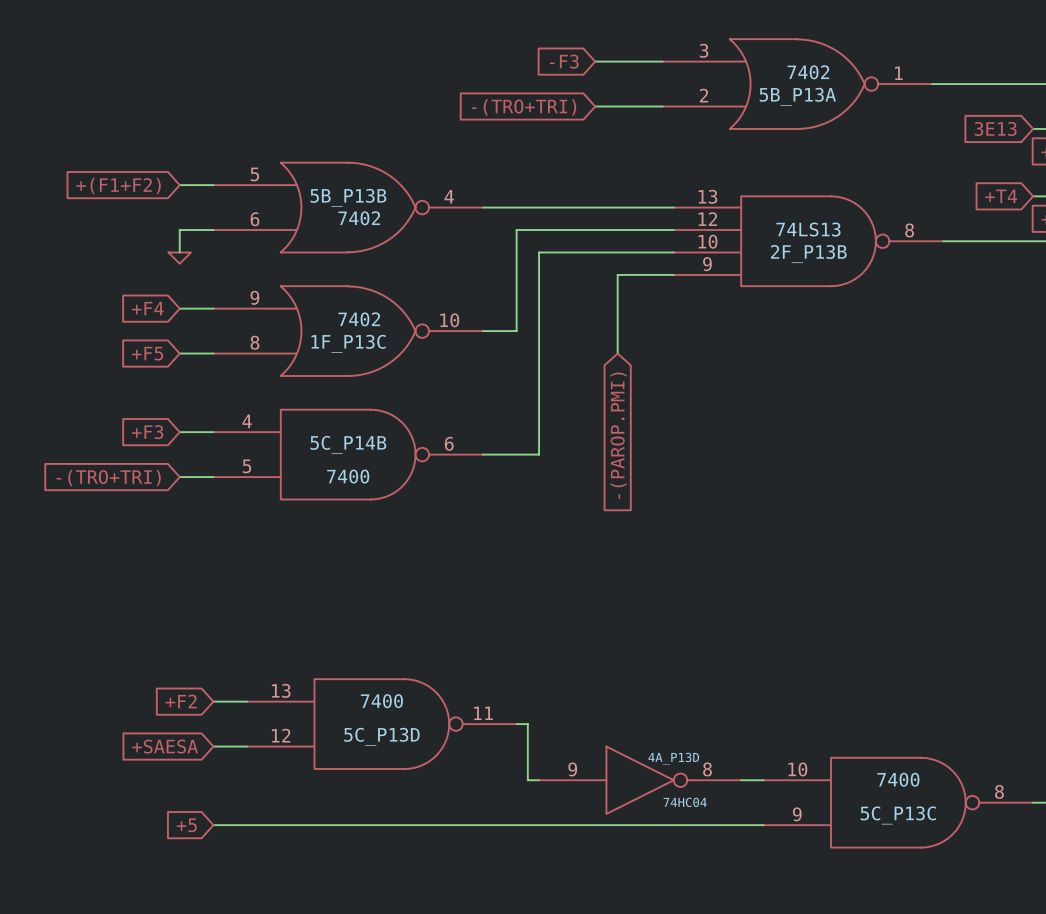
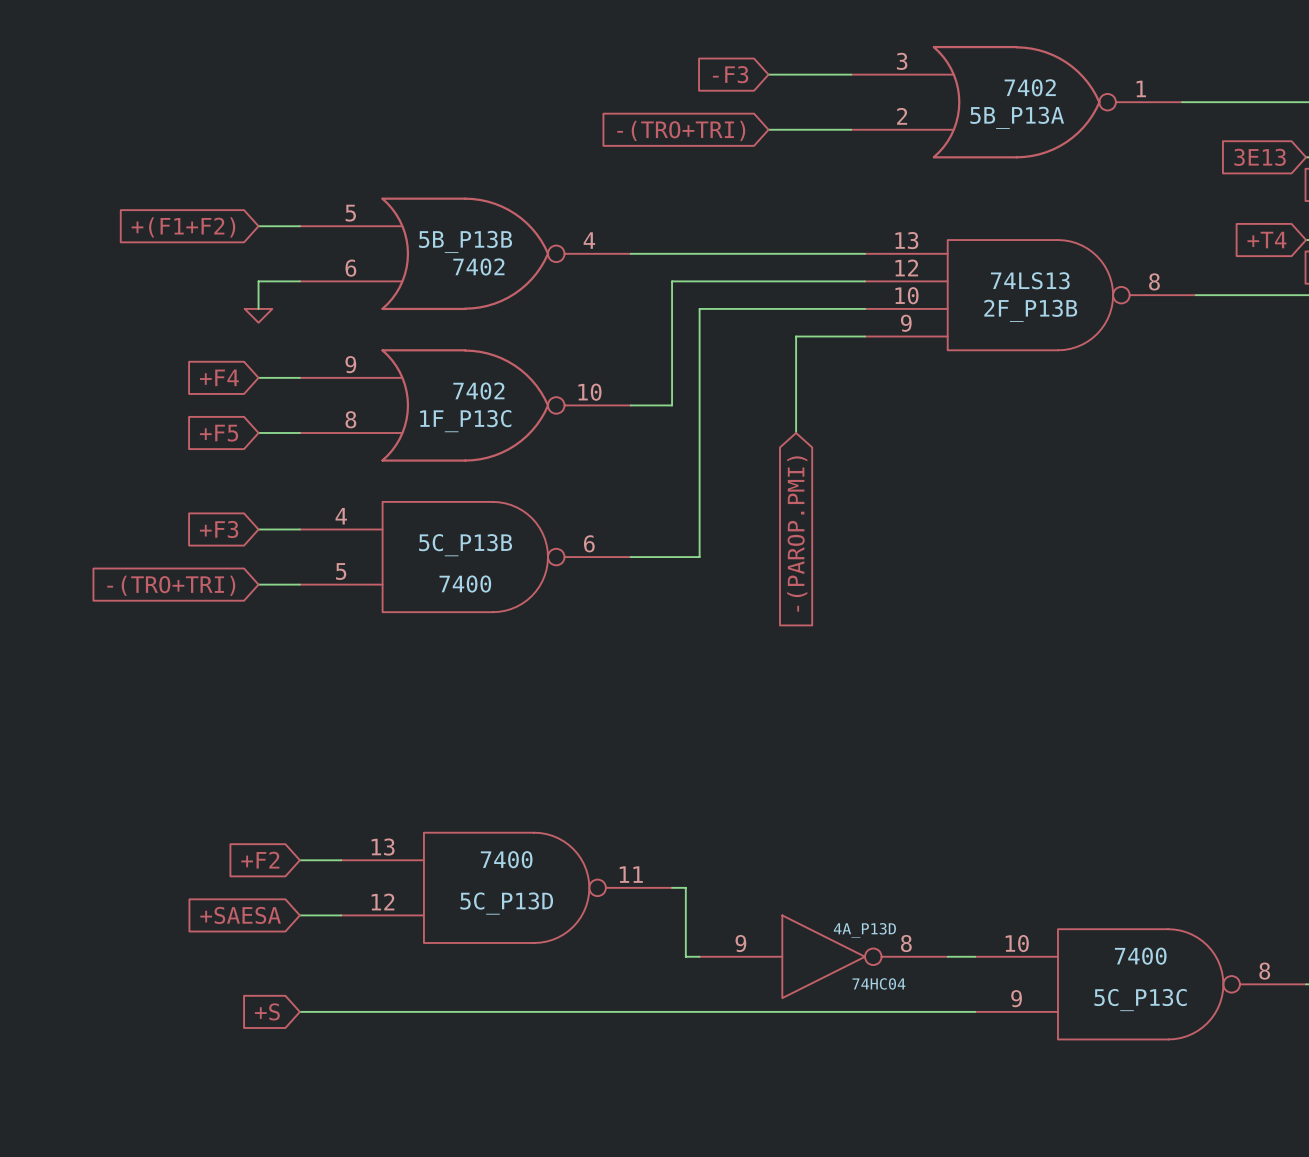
5C_P14B name: 5C_P14B (348, 444) -> 5C_P13B (465, 545)
global label: +5 (186, 825) -> +S (267, 1011)

